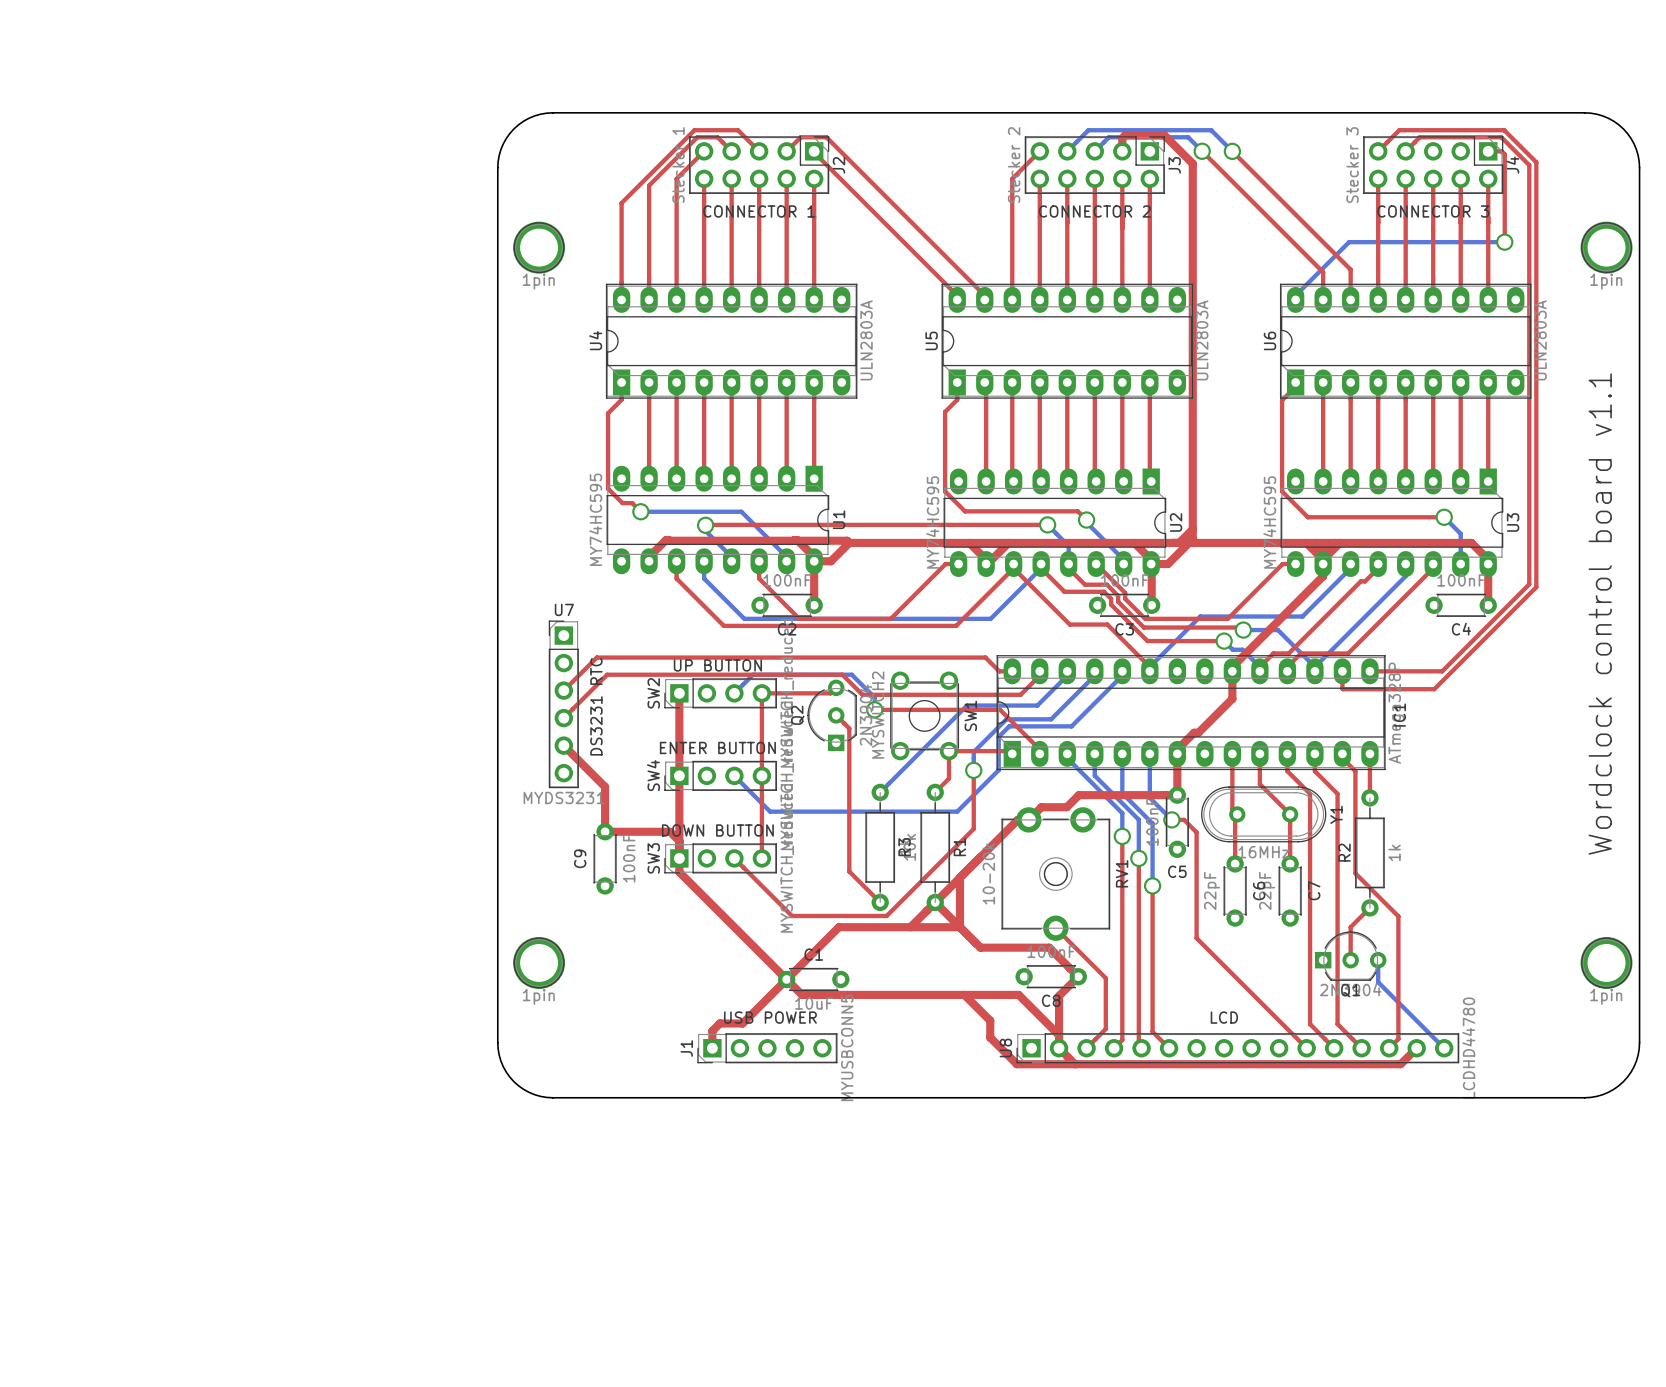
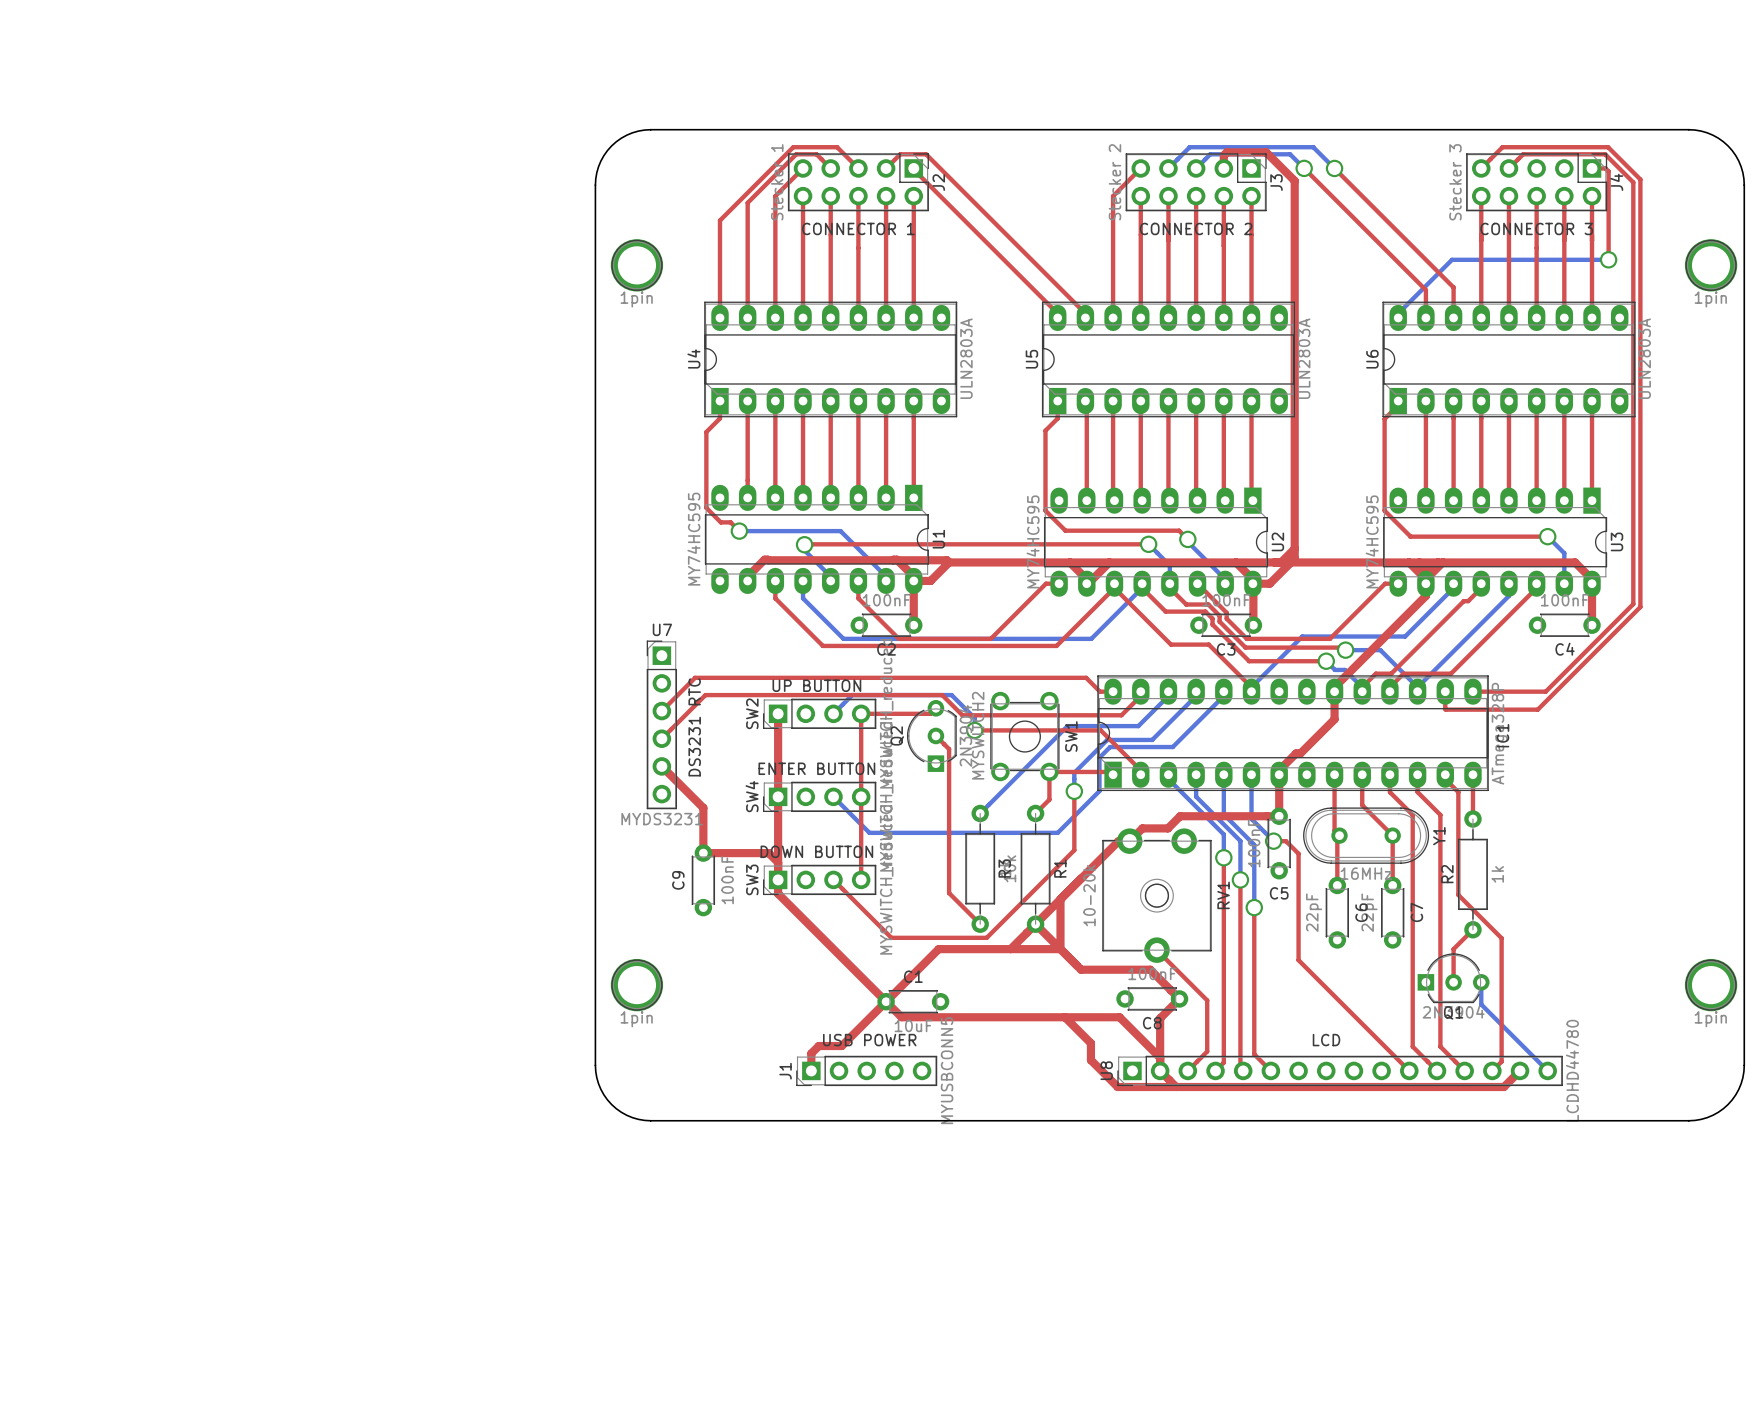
text: Wordclock control board v1.1 (1600, 614) -> none

